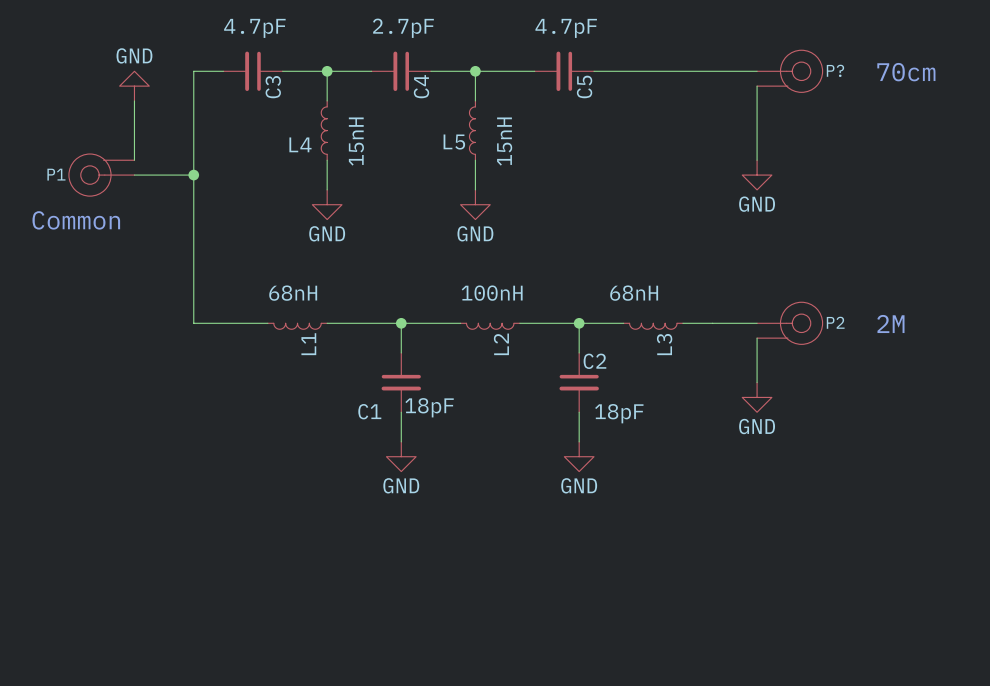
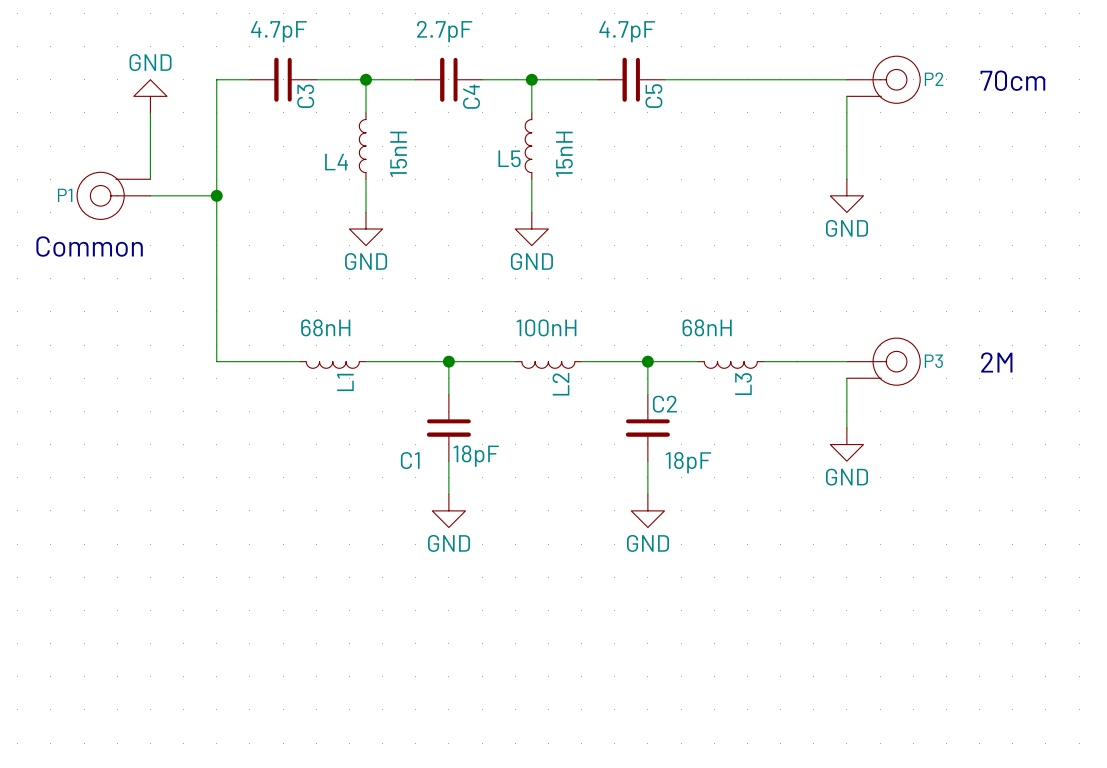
P? name: P? (835, 70) -> P2 (934, 79)
P2 name: P2 (835, 322) -> P3 (933, 361)

